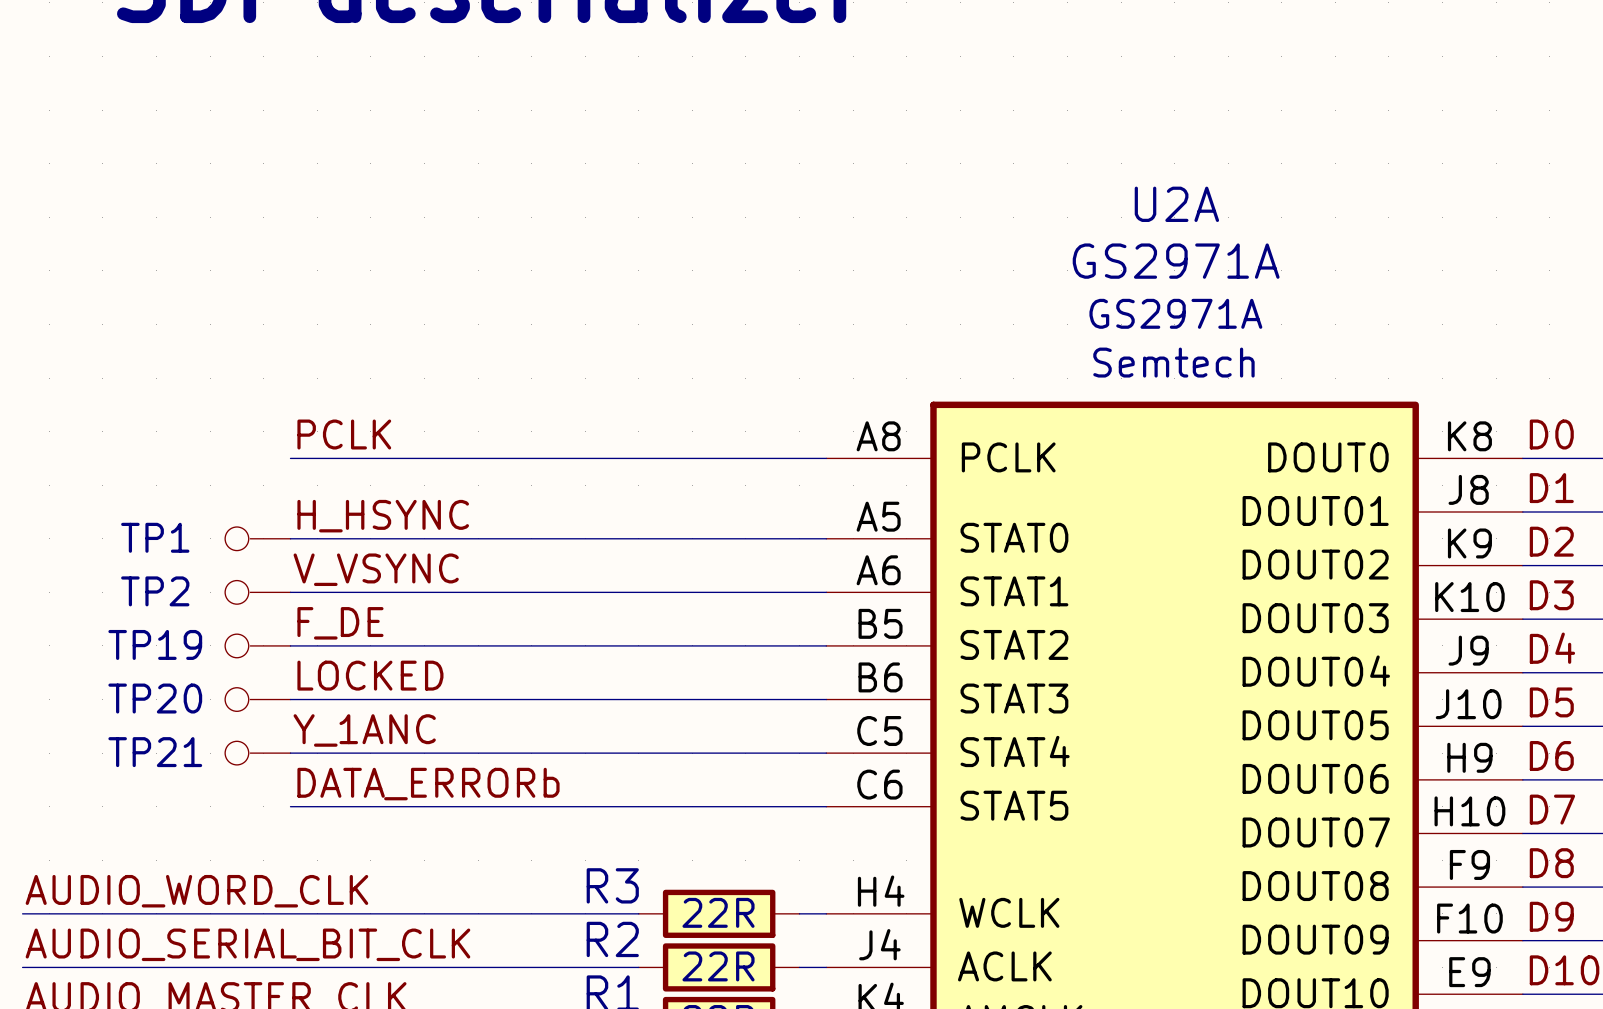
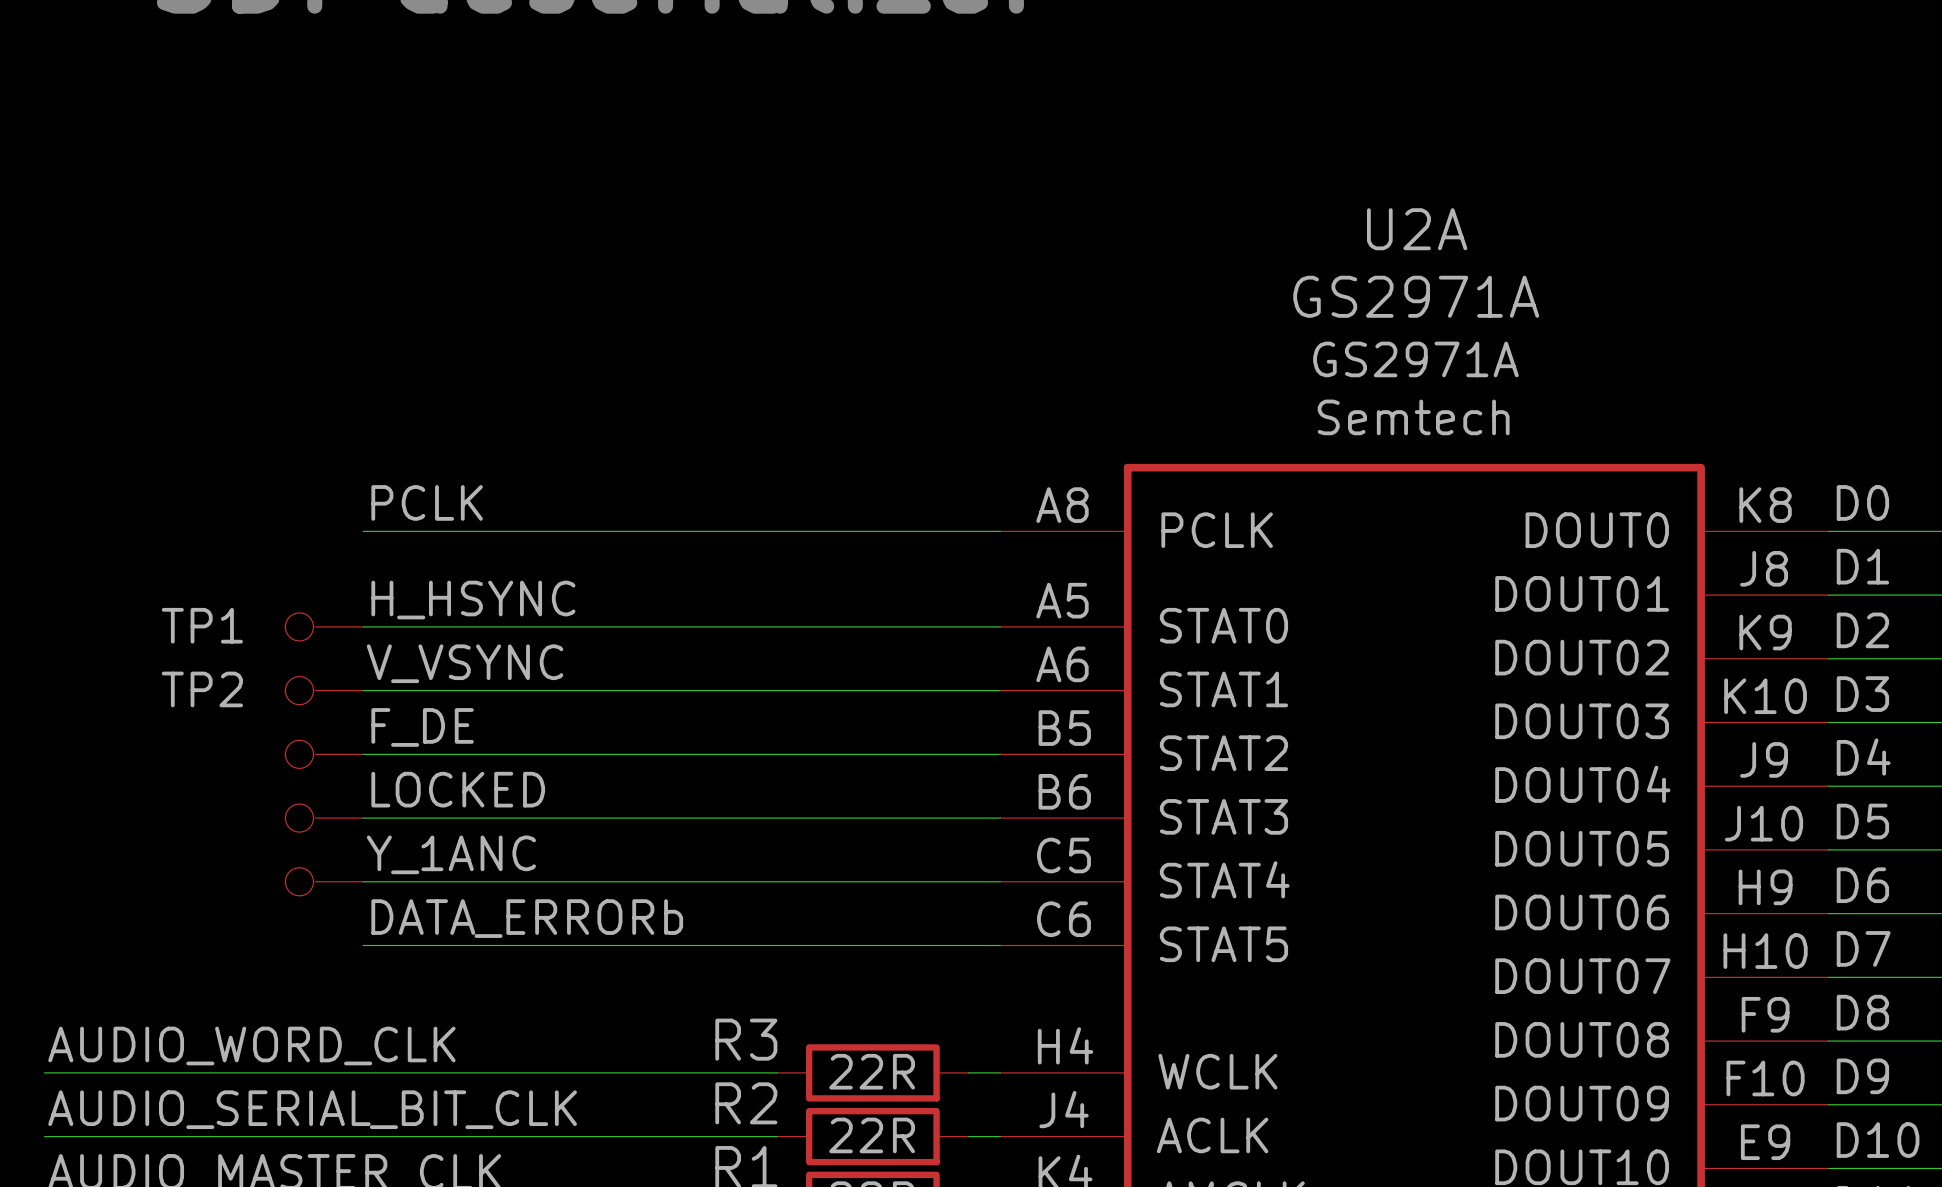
TP19 name: TP19 (155, 644) -> none
TP20 name: TP20 (155, 698) -> none
TP21 name: TP21 (155, 752) -> none

